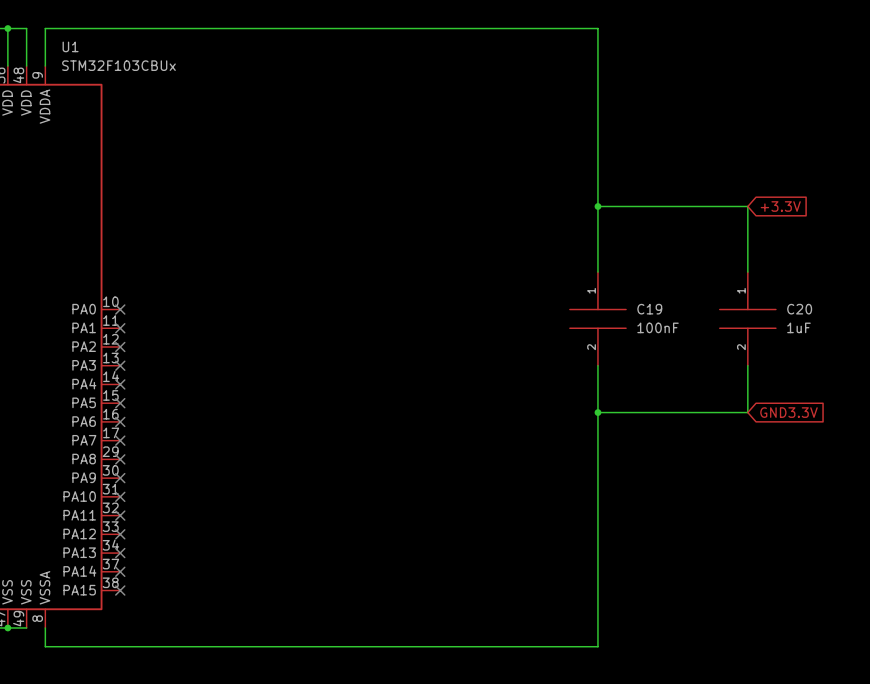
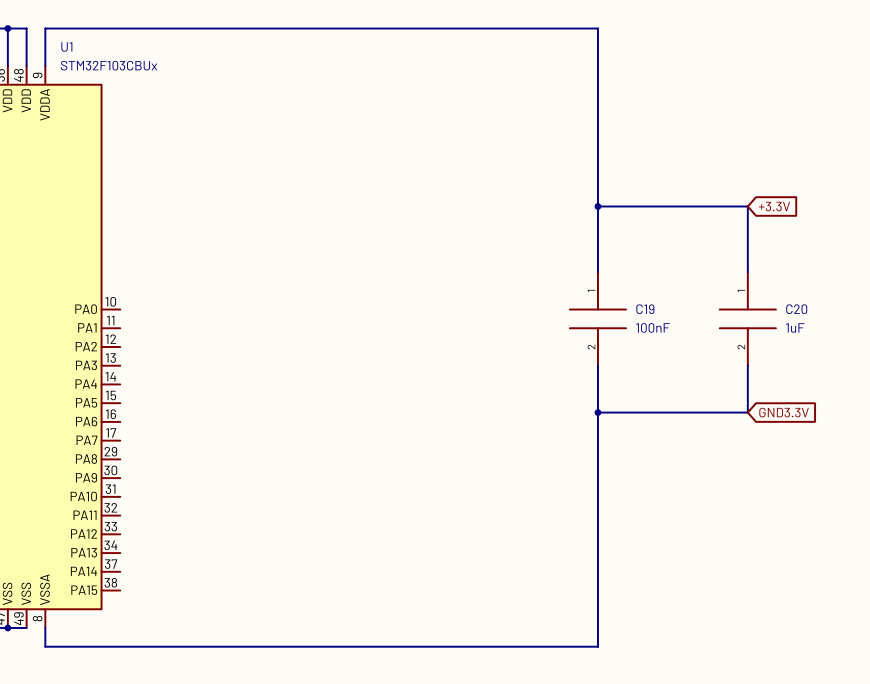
no-connect mark: (120, 309) -> none
no-connect mark: (120, 328) -> none
no-connect mark: (120, 346) -> none
no-connect mark: (120, 365) -> none
no-connect mark: (120, 384) -> none
no-connect mark: (120, 403) -> none
no-connect mark: (120, 421) -> none
no-connect mark: (120, 440) -> none
no-connect mark: (120, 459) -> none
no-connect mark: (120, 478) -> none
no-connect mark: (120, 496) -> none
no-connect mark: (120, 515) -> none
no-connect mark: (120, 534) -> none
no-connect mark: (120, 553) -> none
no-connect mark: (120, 571) -> none
no-connect mark: (120, 590) -> none

